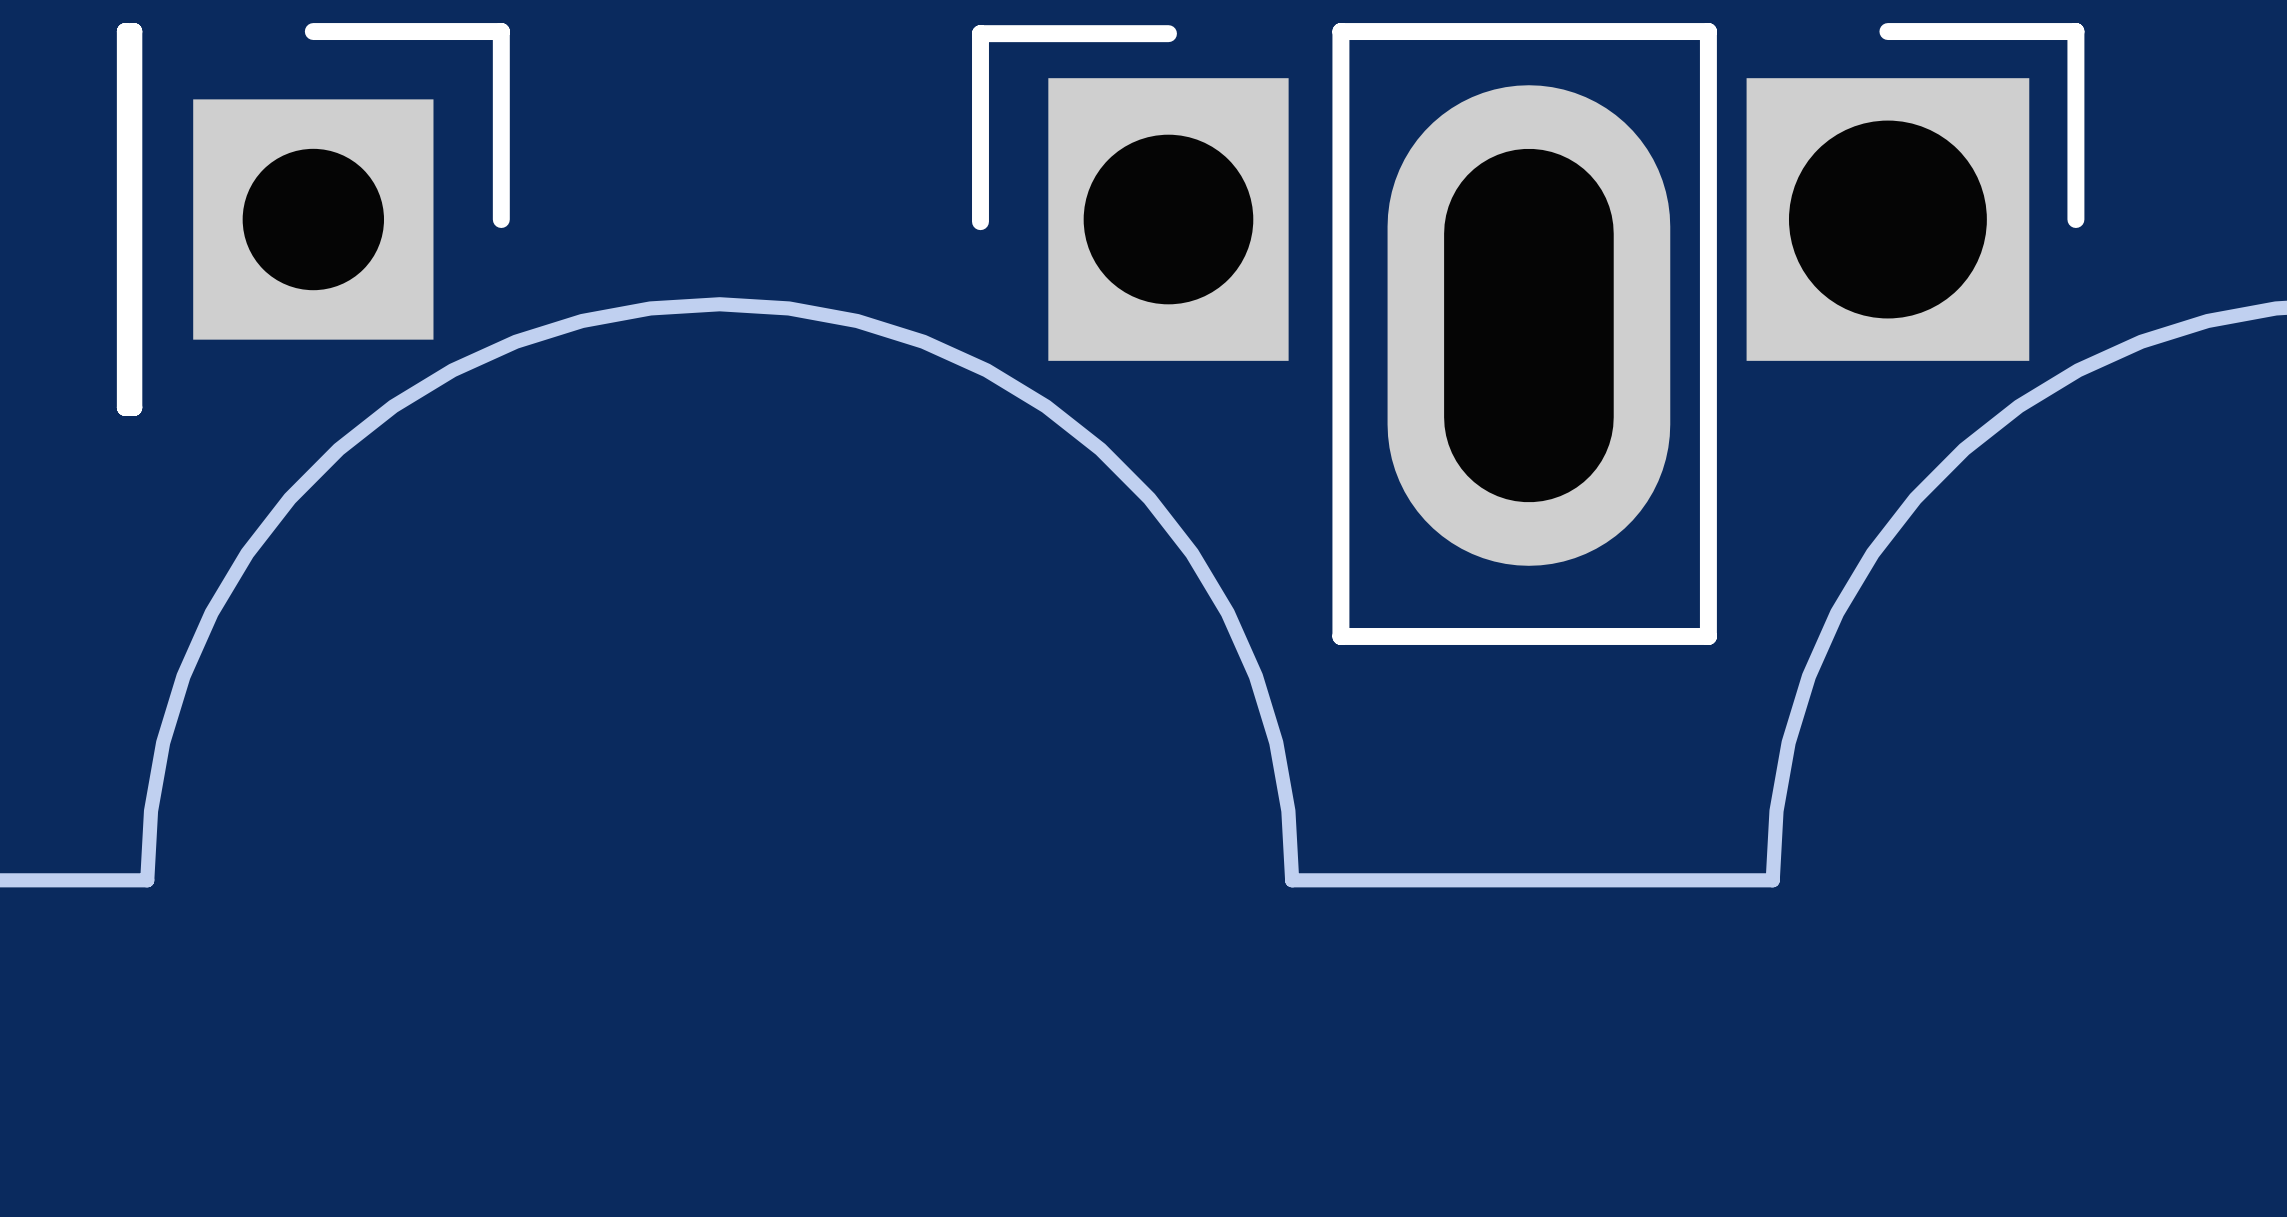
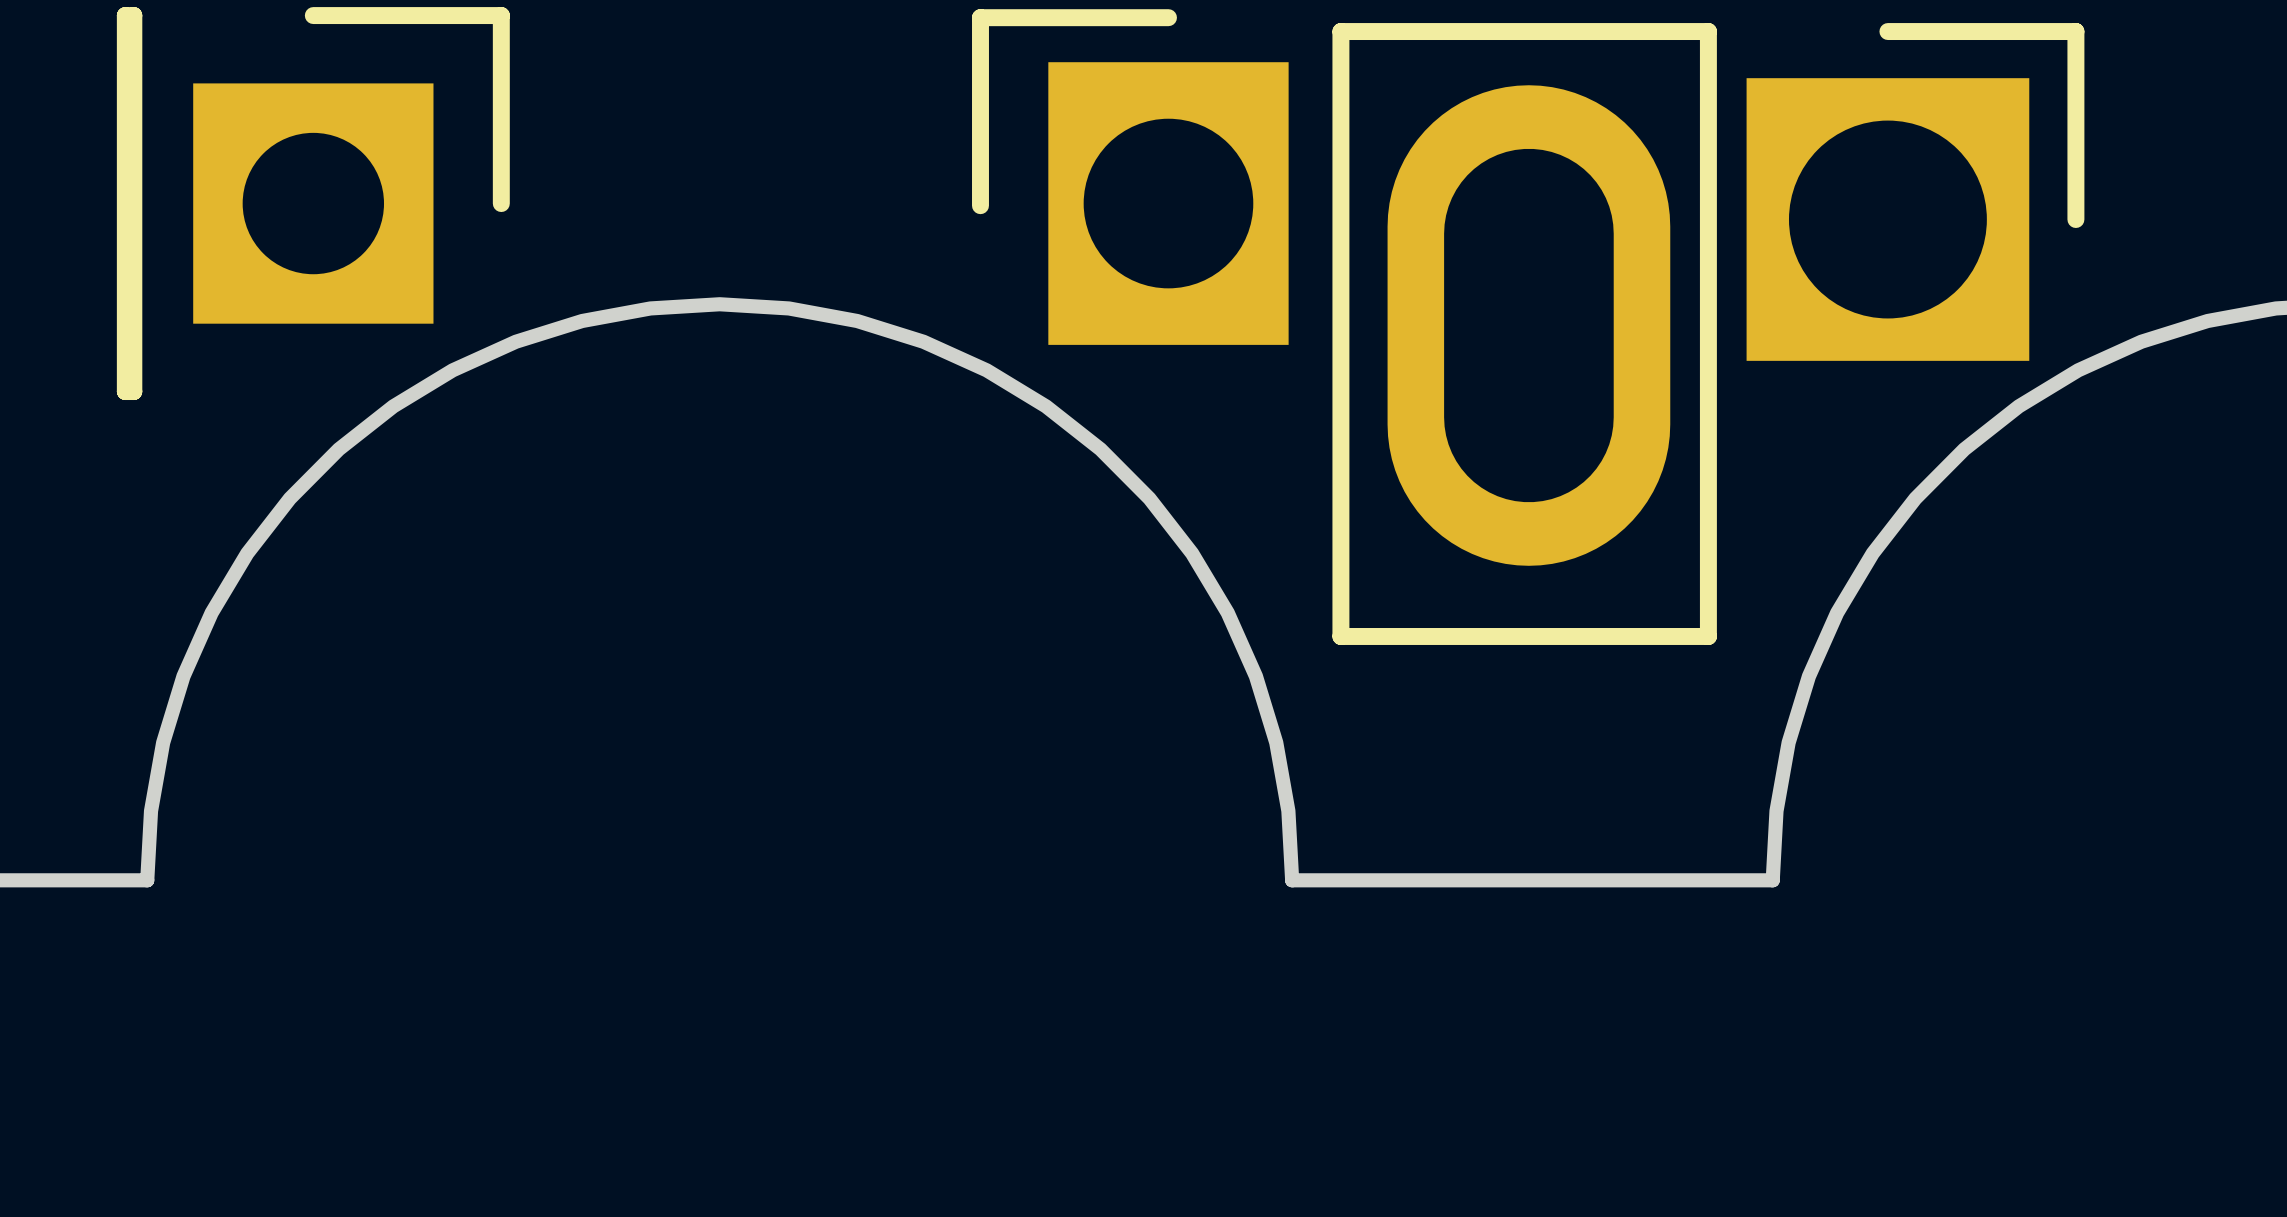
part position: (1130, 193) -> (1130, 177)
part position: (313, 219) -> (313, 203)

